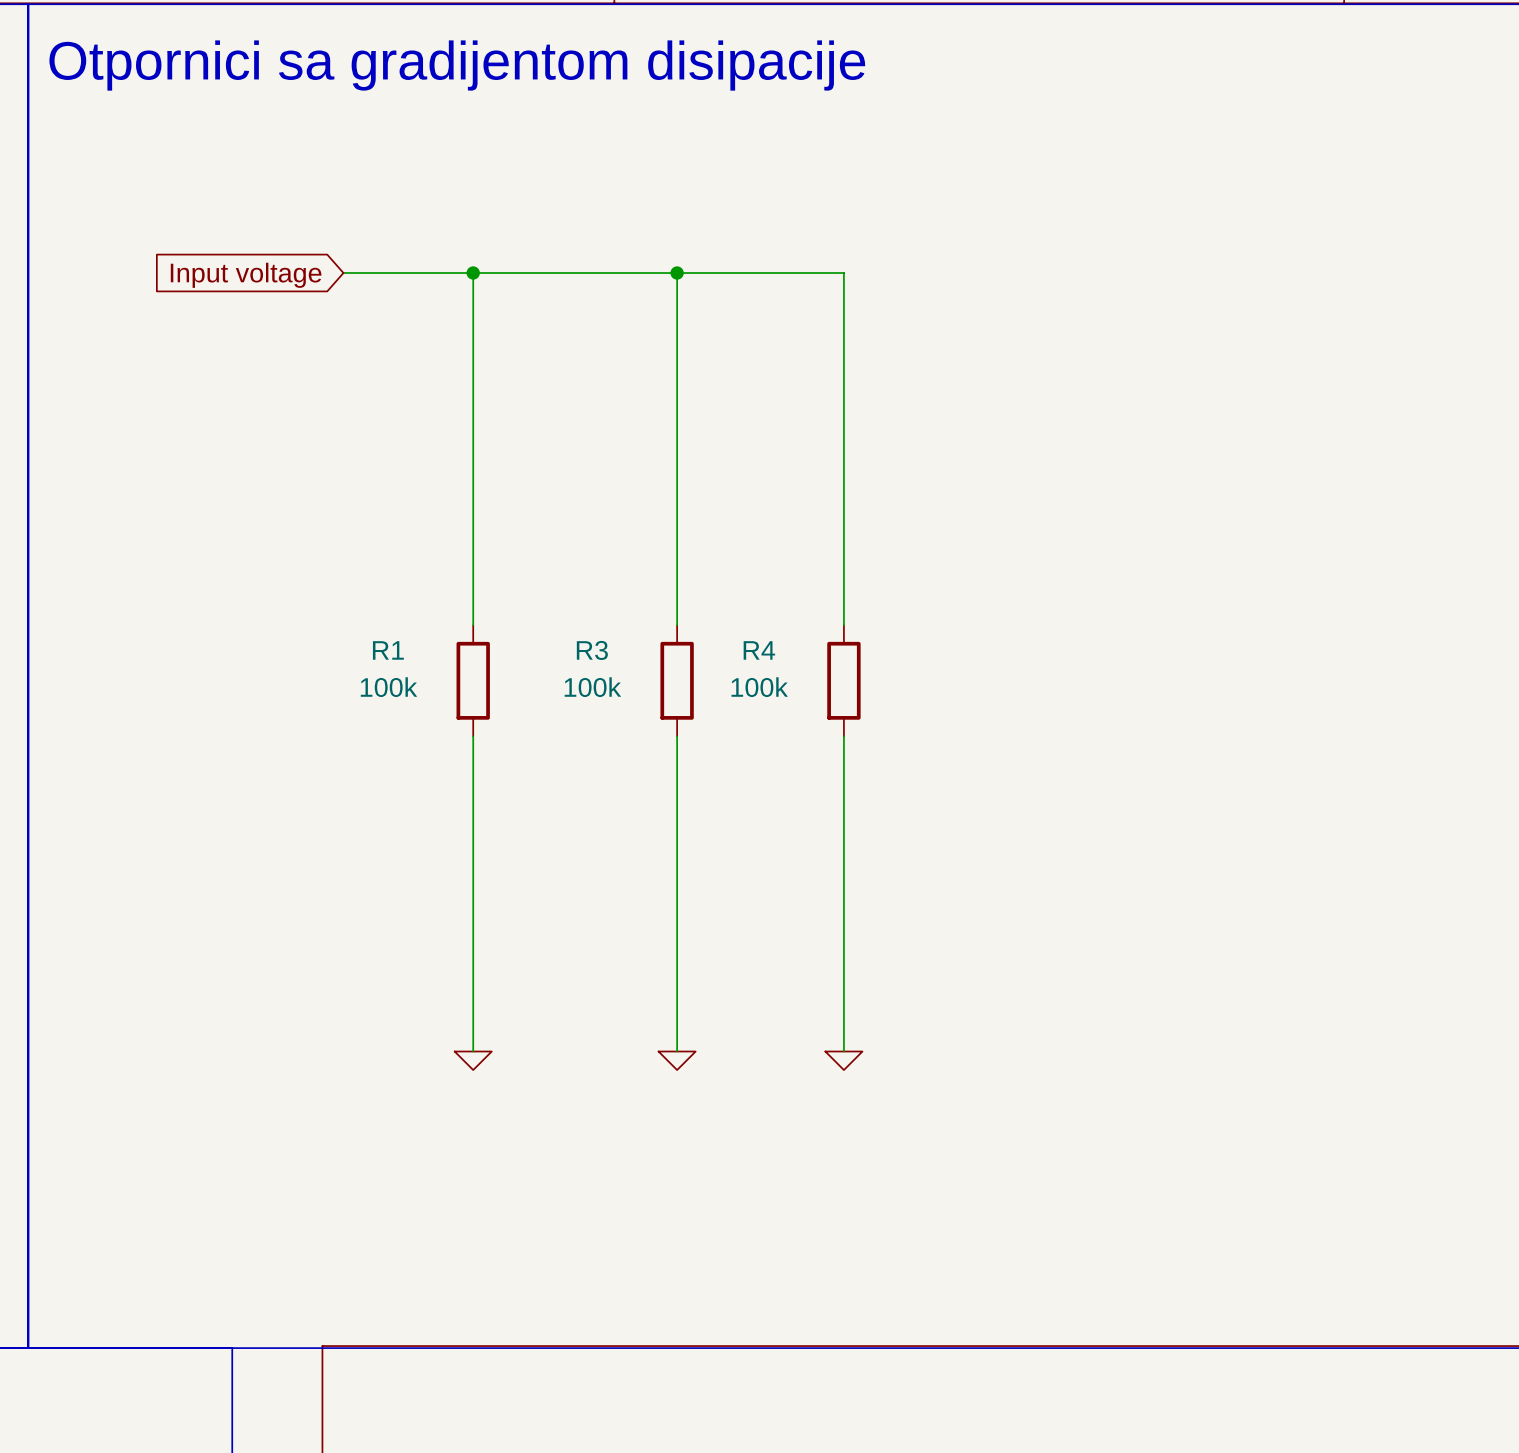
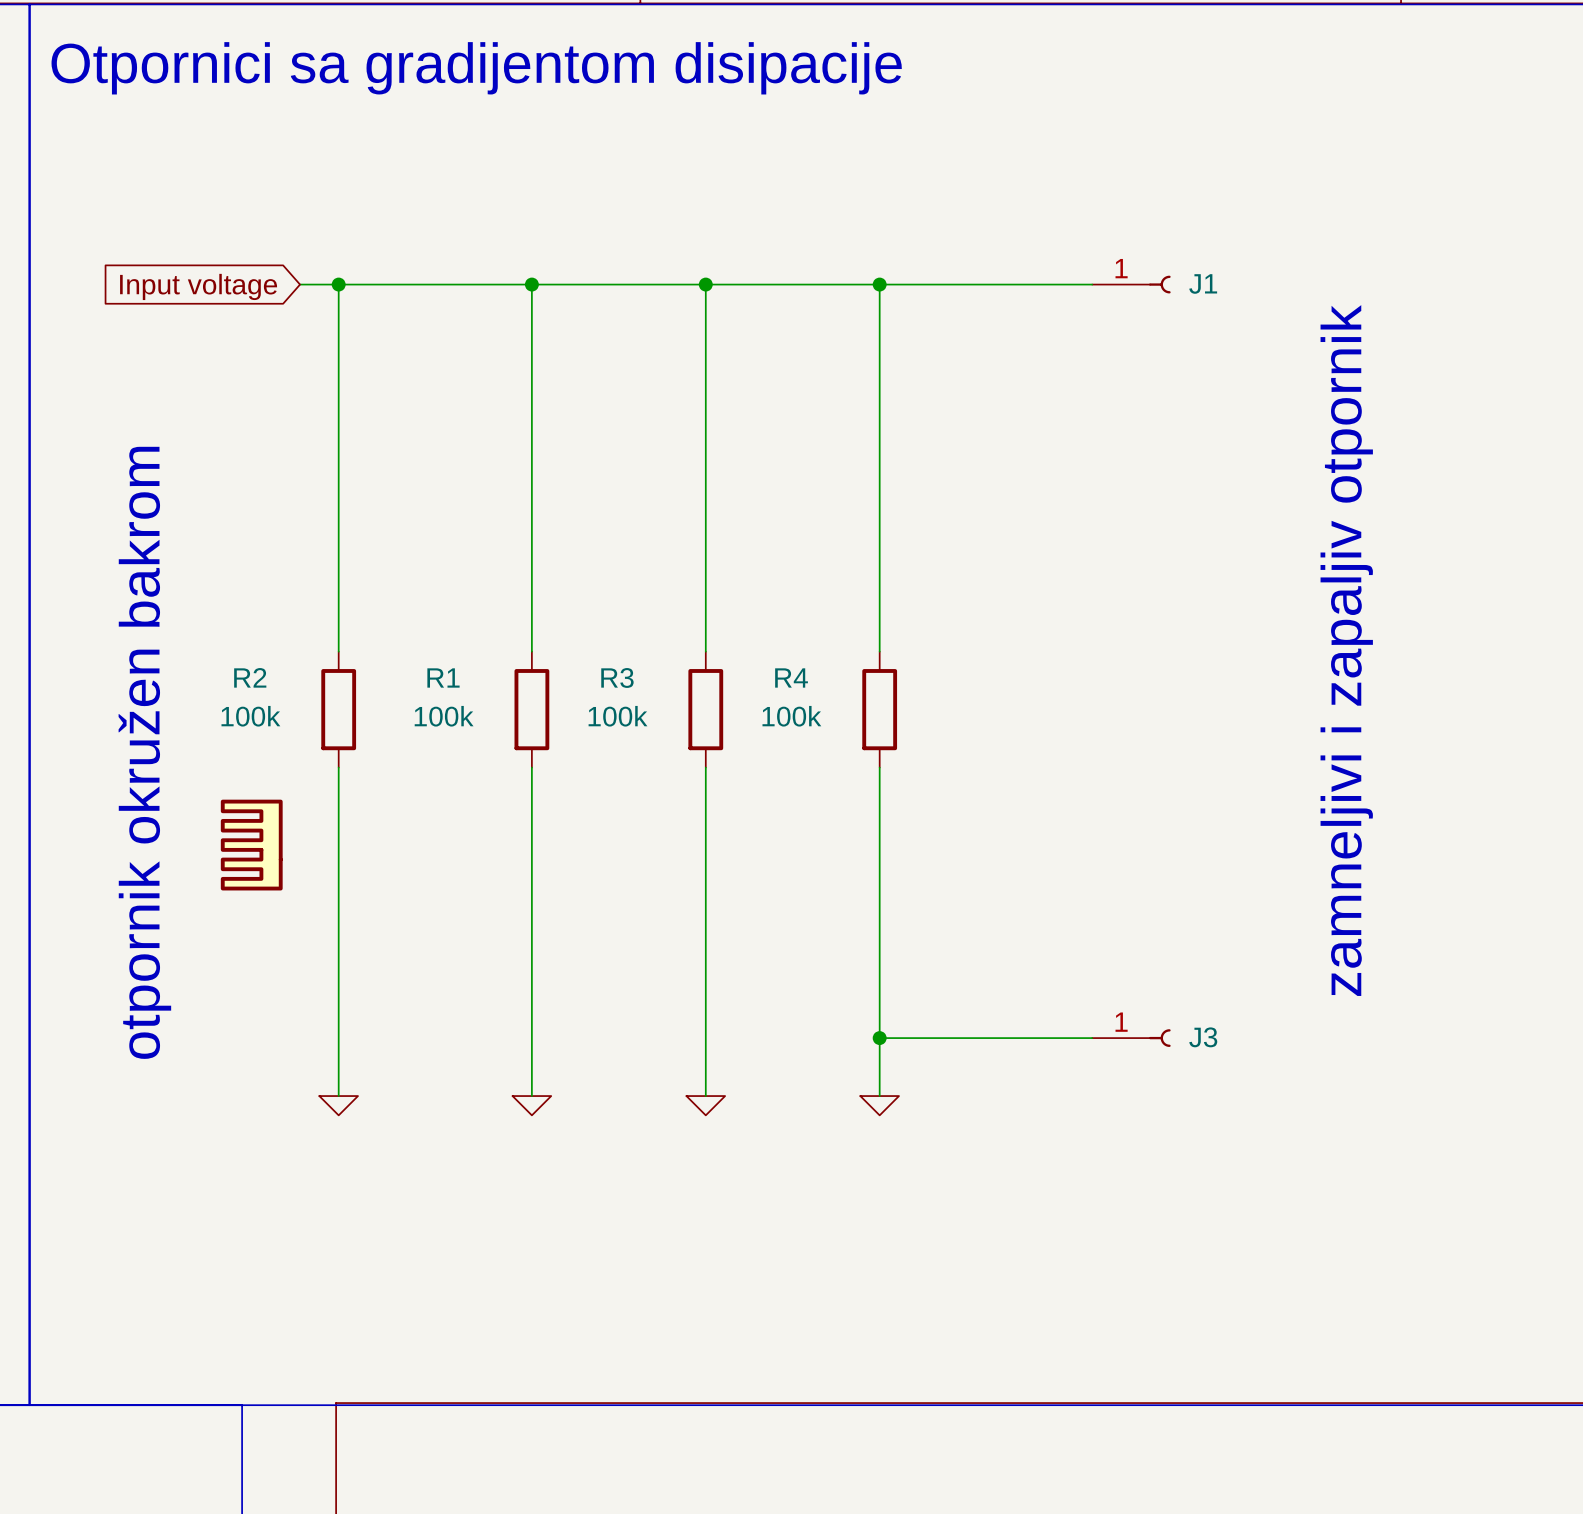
wire: none -> (300, 284) (358, 284)
wire: none -> (338, 284) (338, 651)
junction: none -> (338, 284)
wire: (473, 273) (473, 625) -> (531, 284) (531, 651)
junction position: (473, 273) -> (531, 284)
wire: none -> (879, 284) (1092, 284)
junction: none -> (879, 284)
J1: none -> (1131, 284)
global label position: Input voltage (246, 275) -> Input voltage (198, 286)
text: none -> zamneljivi i zapaljiv otpornik (1346, 650)
R2: none -> 100k (338, 709)
R1 position: (473, 680) -> (531, 709)
text: none -> otpornik okružen bakrom (144, 752)
wire: none -> (338, 767) (338, 1096)
wire: (473, 736) (473, 1051) -> (531, 767) (531, 1096)
part: none -> (251, 845)
wire: none -> (879, 1038) (1092, 1038)
junction: none -> (879, 1038)
J3: none -> (1131, 1038)
power symbol: none -> (338, 1105)
power symbol position: (473, 1060) -> (531, 1105)

